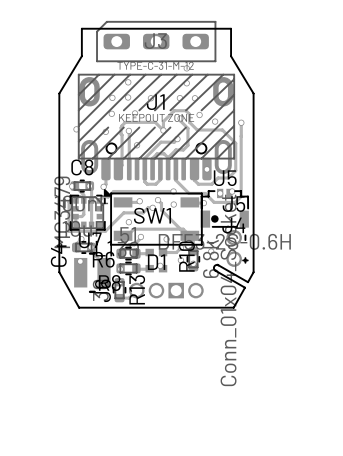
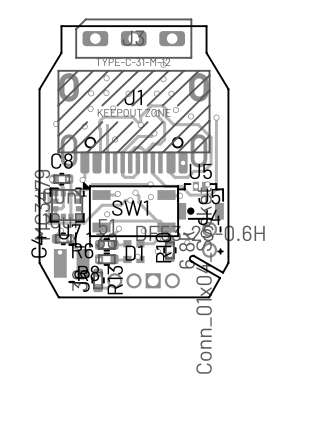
via: (128, 130) -> none

